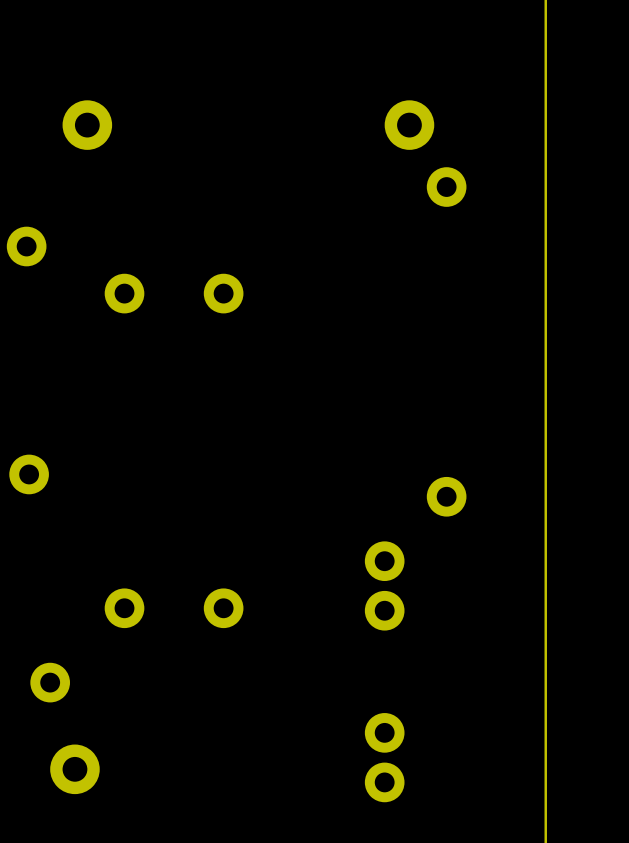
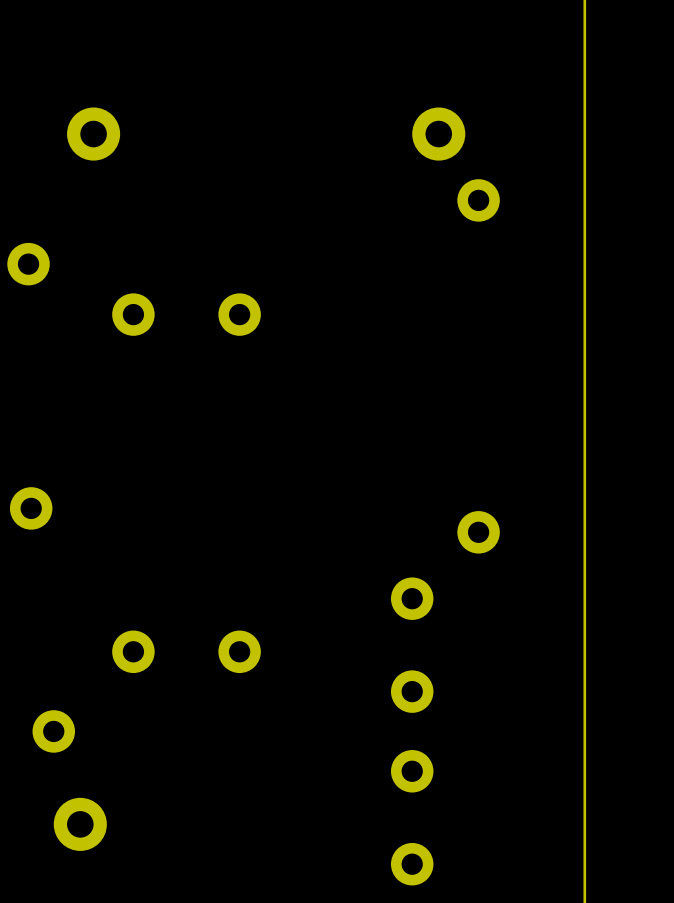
part footprint: [364, 541, 405, 631] -> [390, 577, 434, 713]
part footprint: [364, 713, 405, 803] -> [390, 750, 434, 886]

